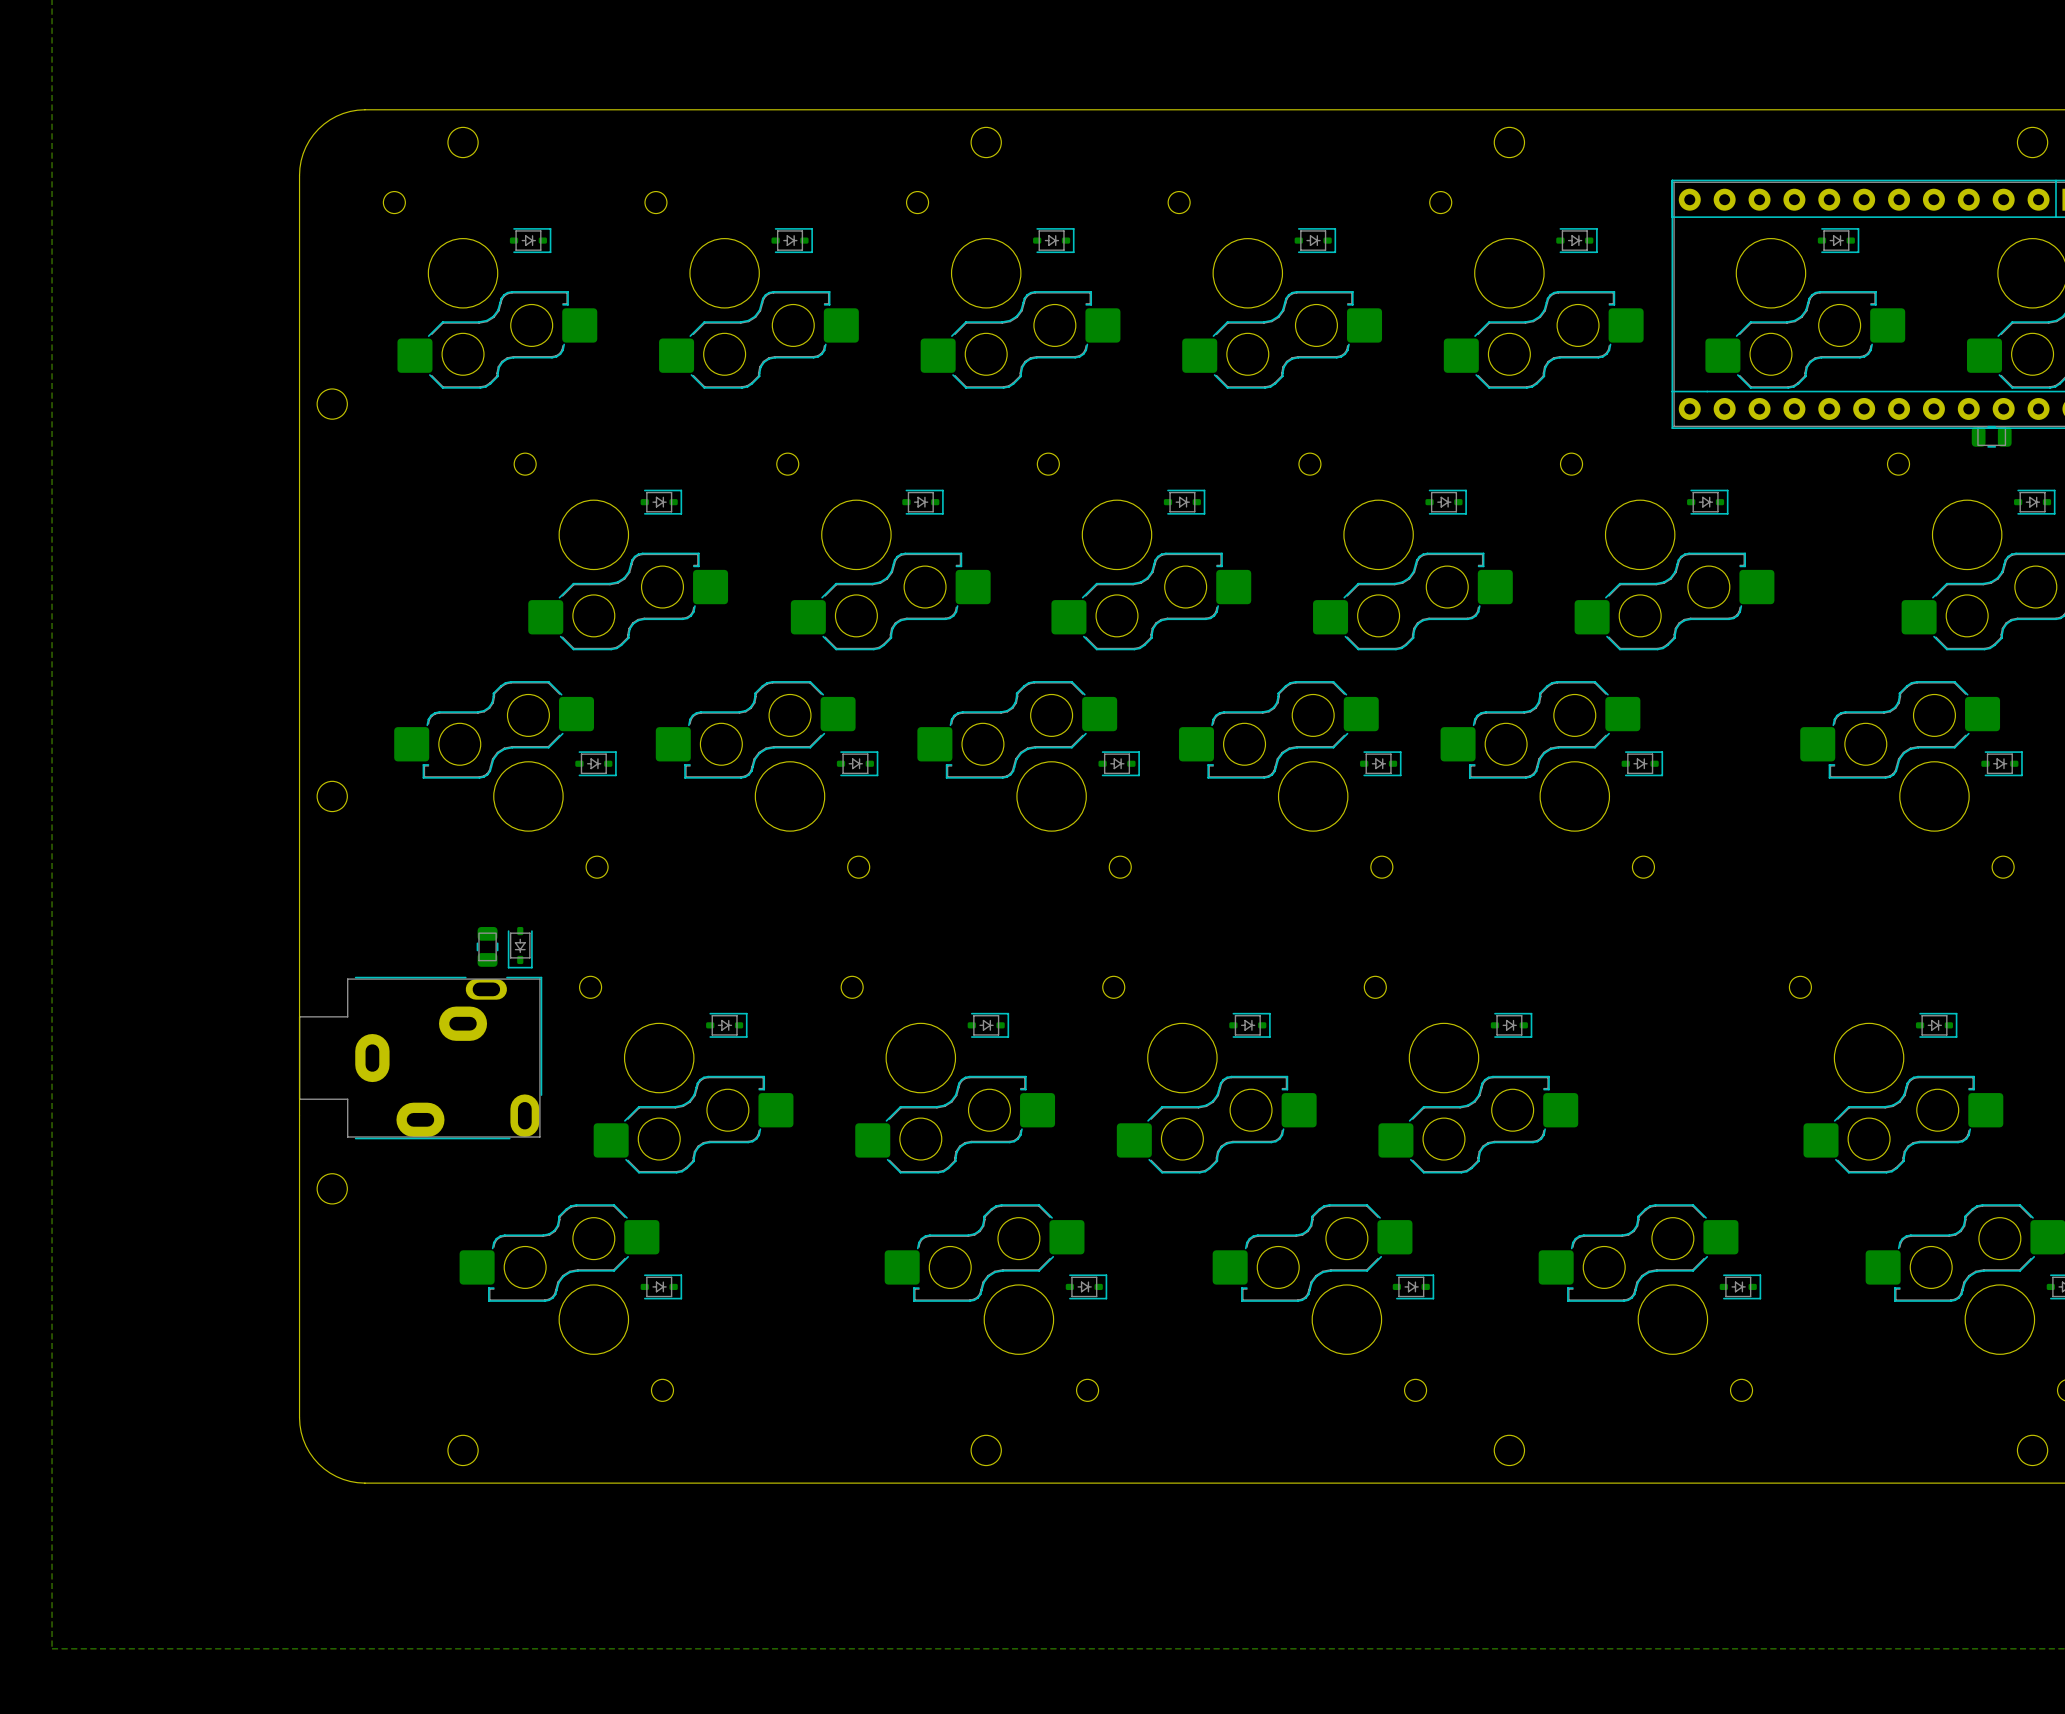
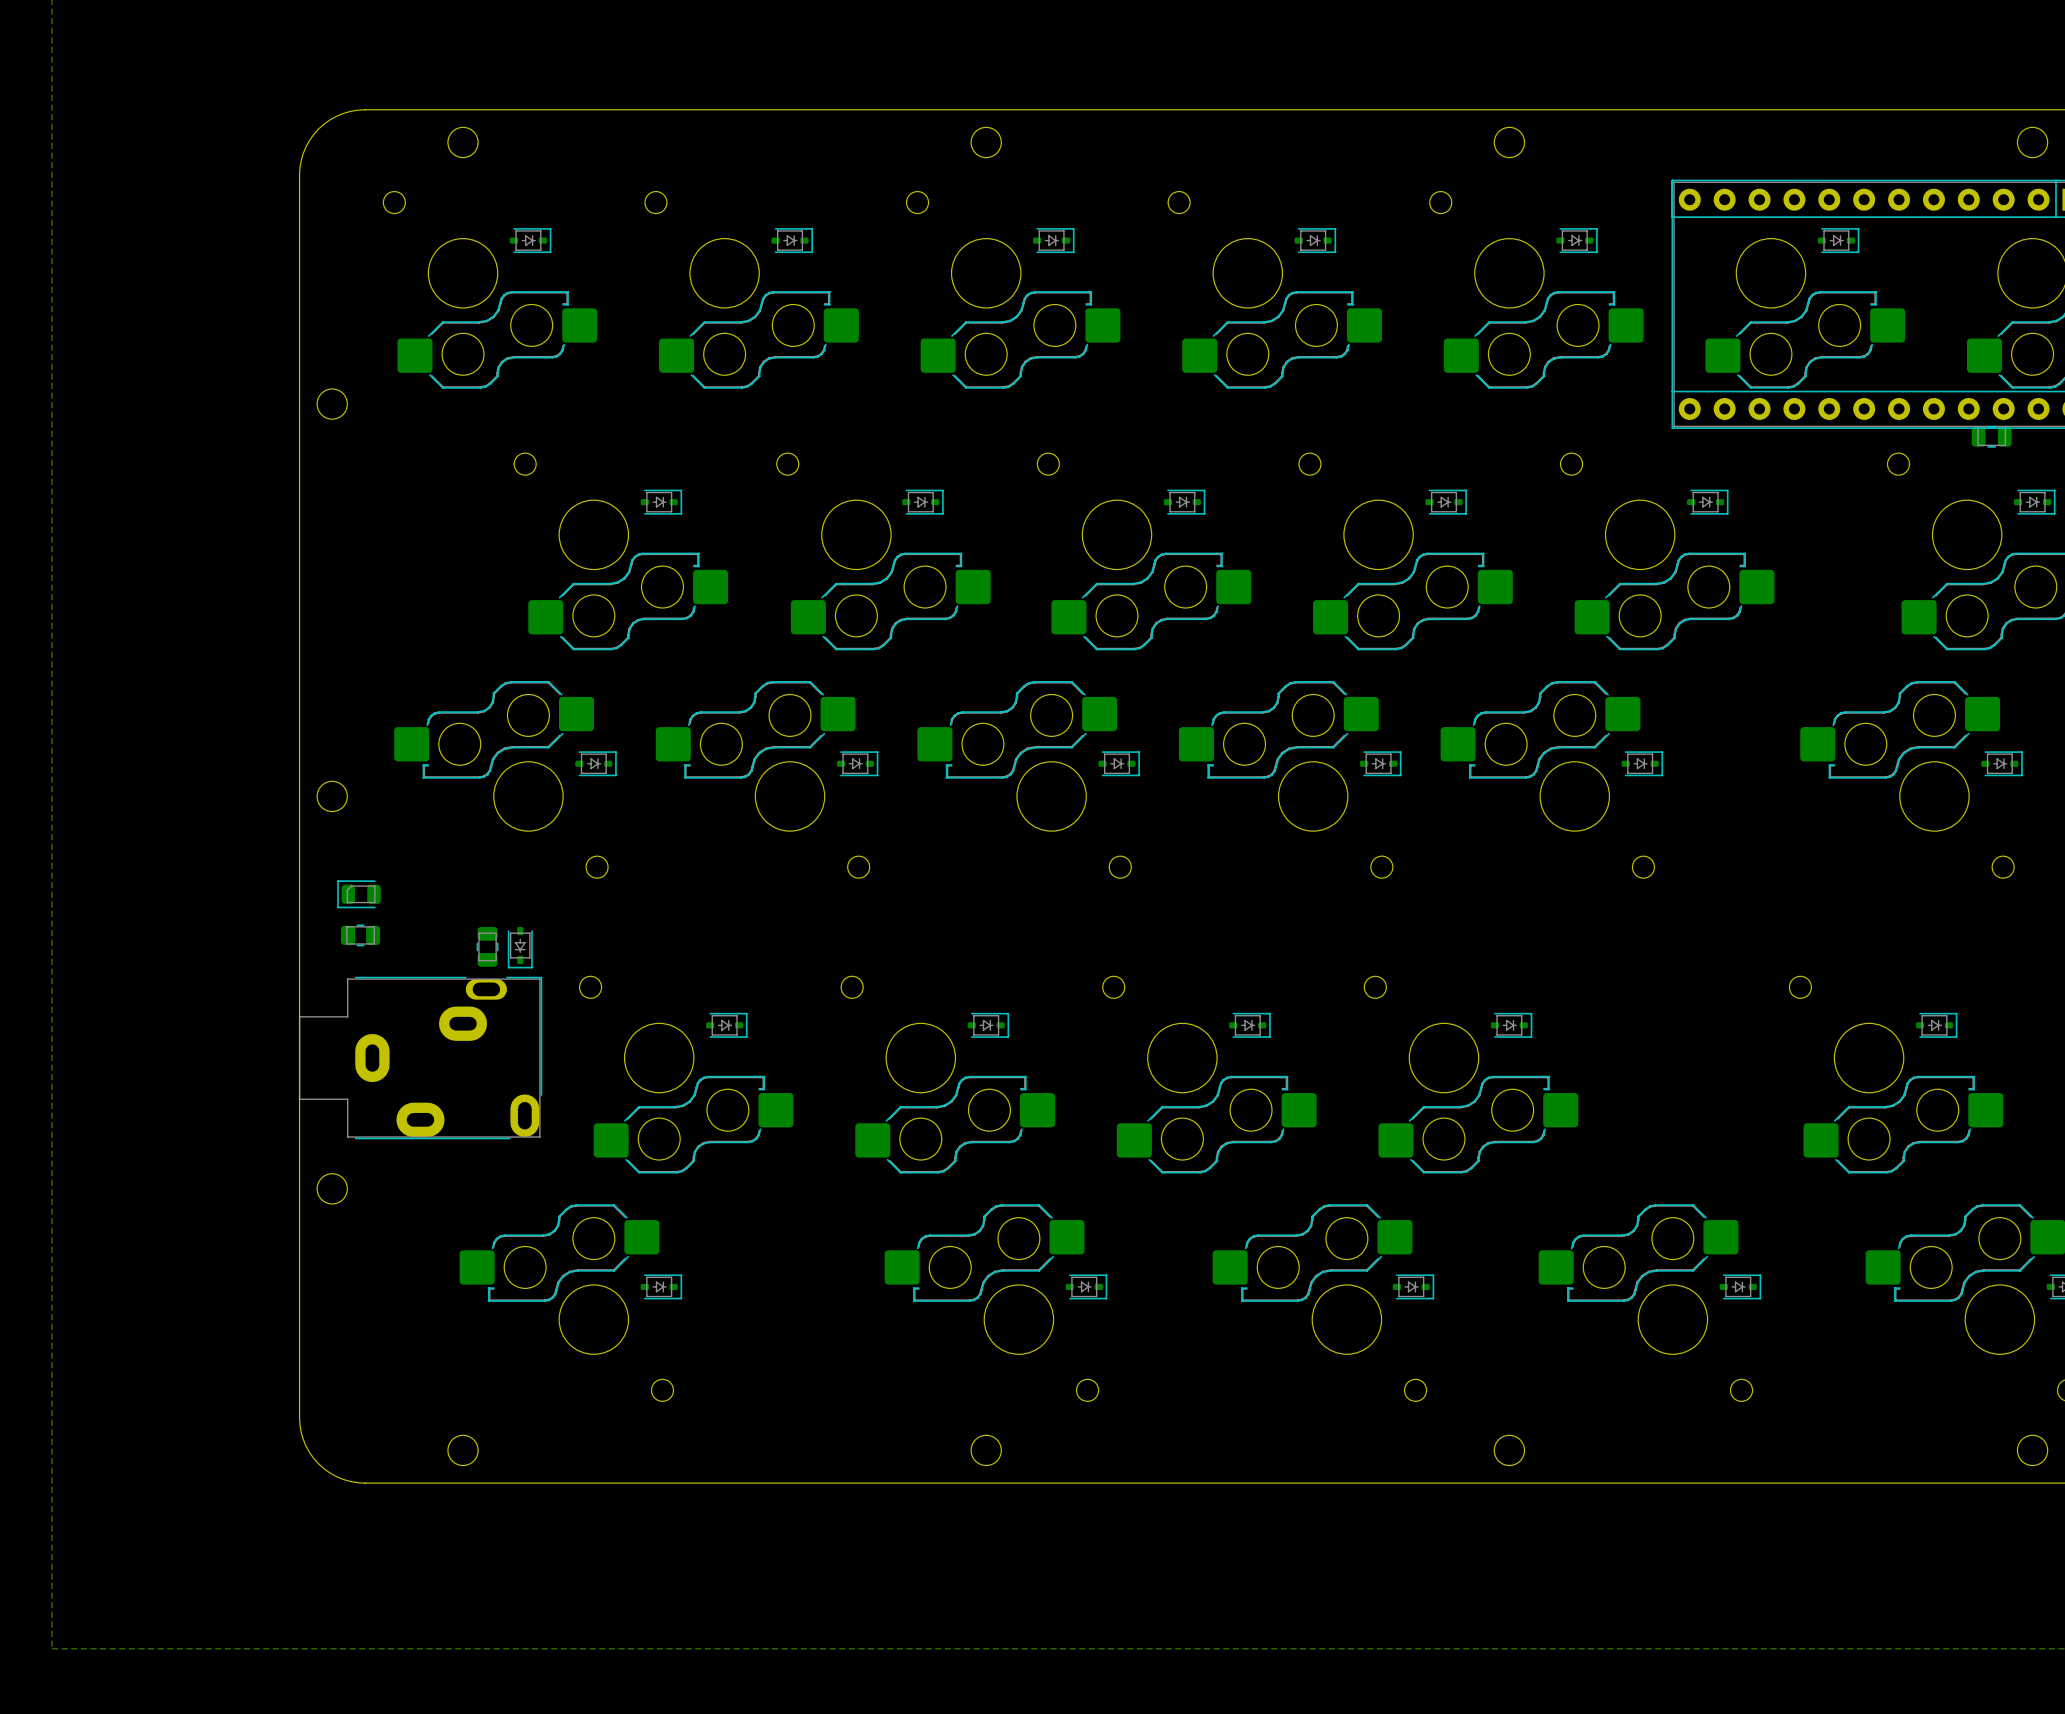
part: none -> (358, 894)
part: none -> (360, 935)

